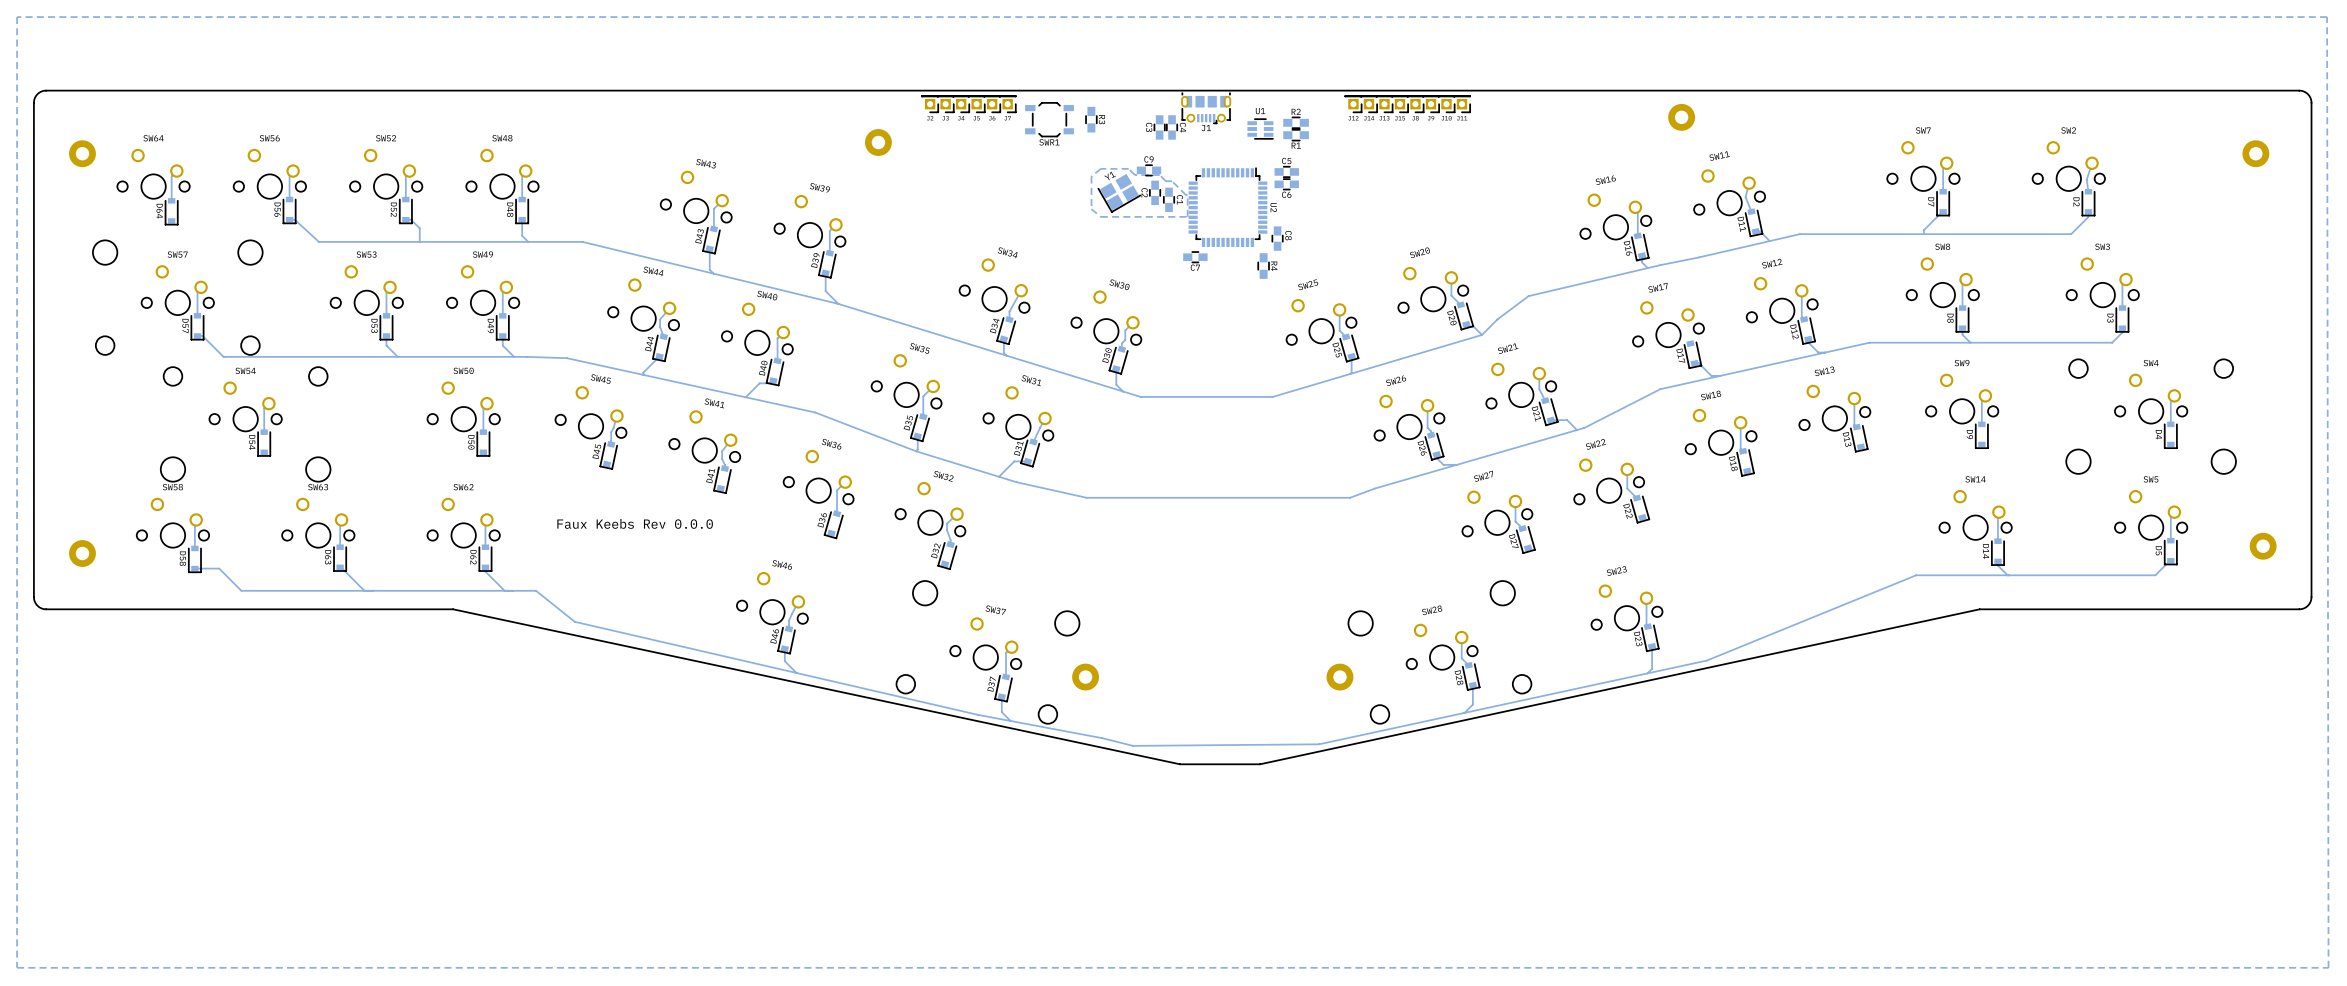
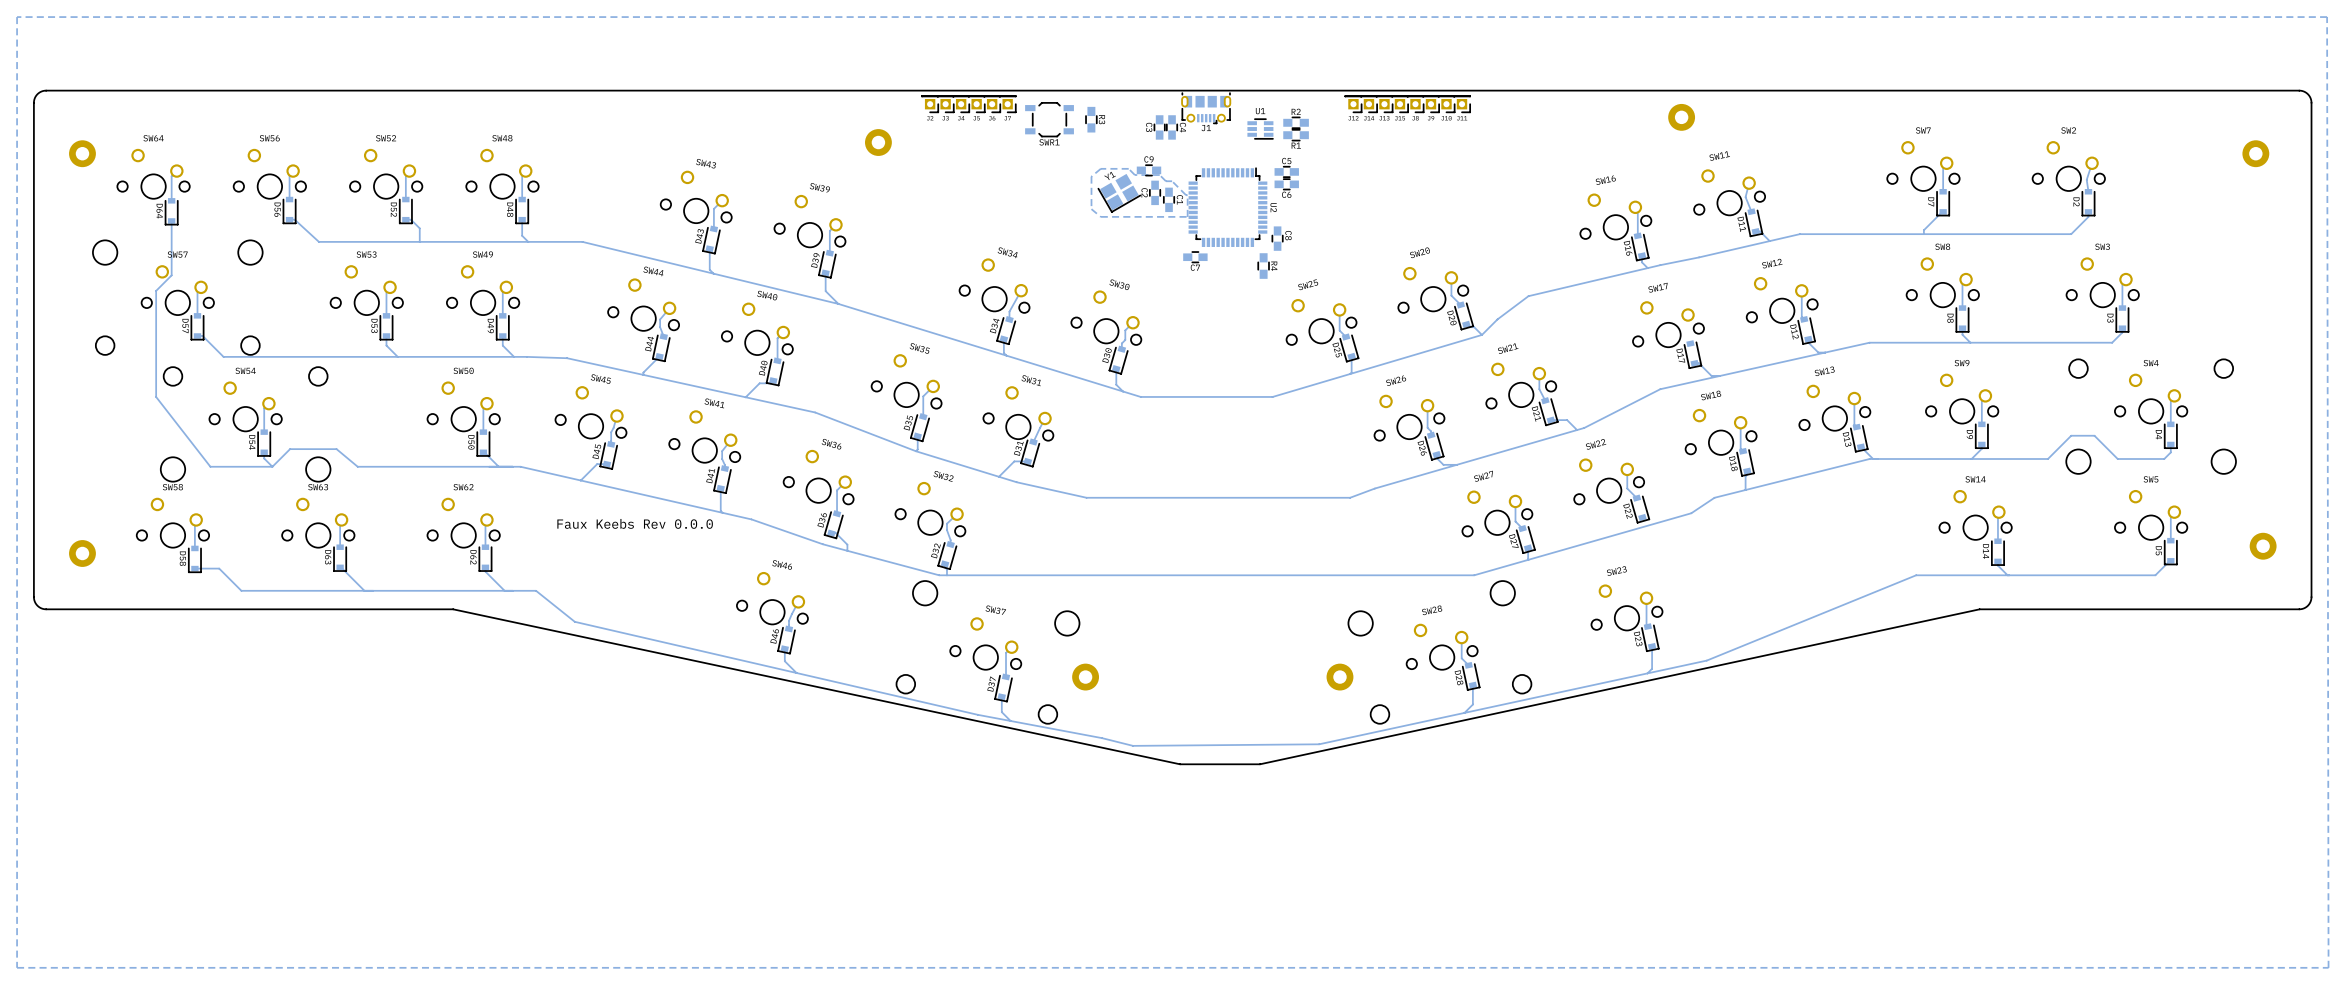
track: none -> (171, 220) (171, 275) (156, 290) (156, 396) (210, 466) (272, 466)
track: none -> (1981, 444) (1981, 448) (1971, 459)
track: none -> (2170, 444) (2170, 452) (2164, 459) (2117, 459) (2094, 435) (2071, 435) (2047, 459) (1869, 459) (1714, 497) (1691, 513) (1474, 575) (939, 575) (822, 544) (751, 519) (520, 466) (357, 466) (336, 449) (290, 449) (272, 466)
track: none -> (1860, 446) (1873, 459)
track: none -> (264, 452) (264, 458) (272, 466)
track: none -> (483, 452) (498, 466)
track: none -> (606, 464) (597, 464) (580, 480)
track: none -> (1747, 471) (1745, 490)
track: none -> (720, 488) (720, 510) (722, 512)
track: none -> (831, 533) (835, 533) (847, 544) (847, 550)
track: none -> (1528, 547) (1528, 559)
track: none -> (945, 563) (946, 575)

